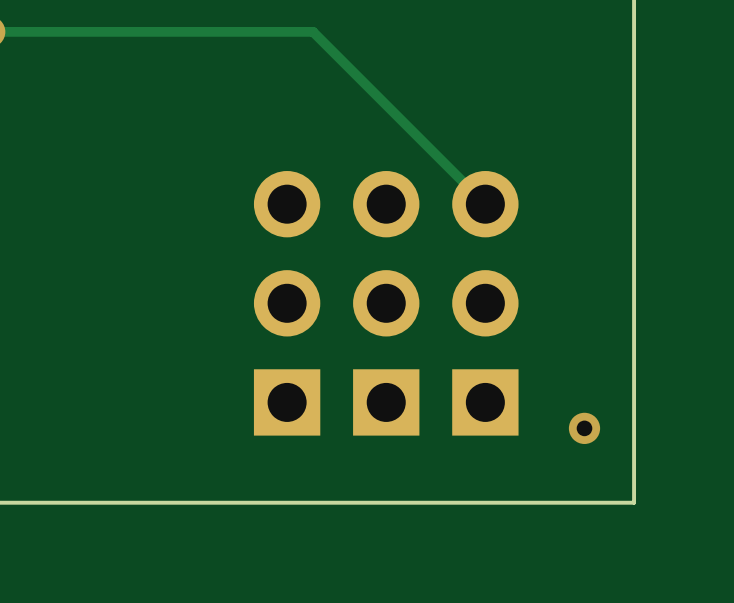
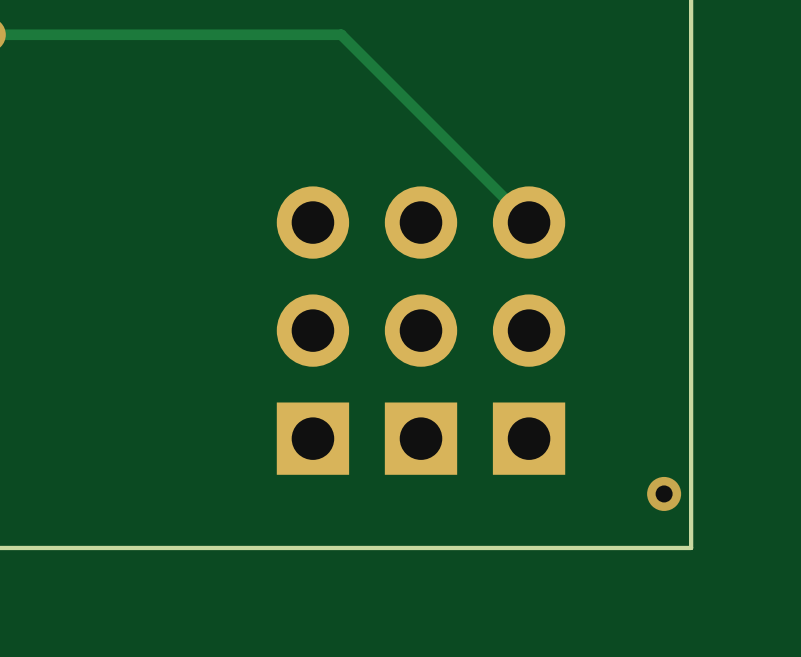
via position: (584, 428) -> (664, 493)

